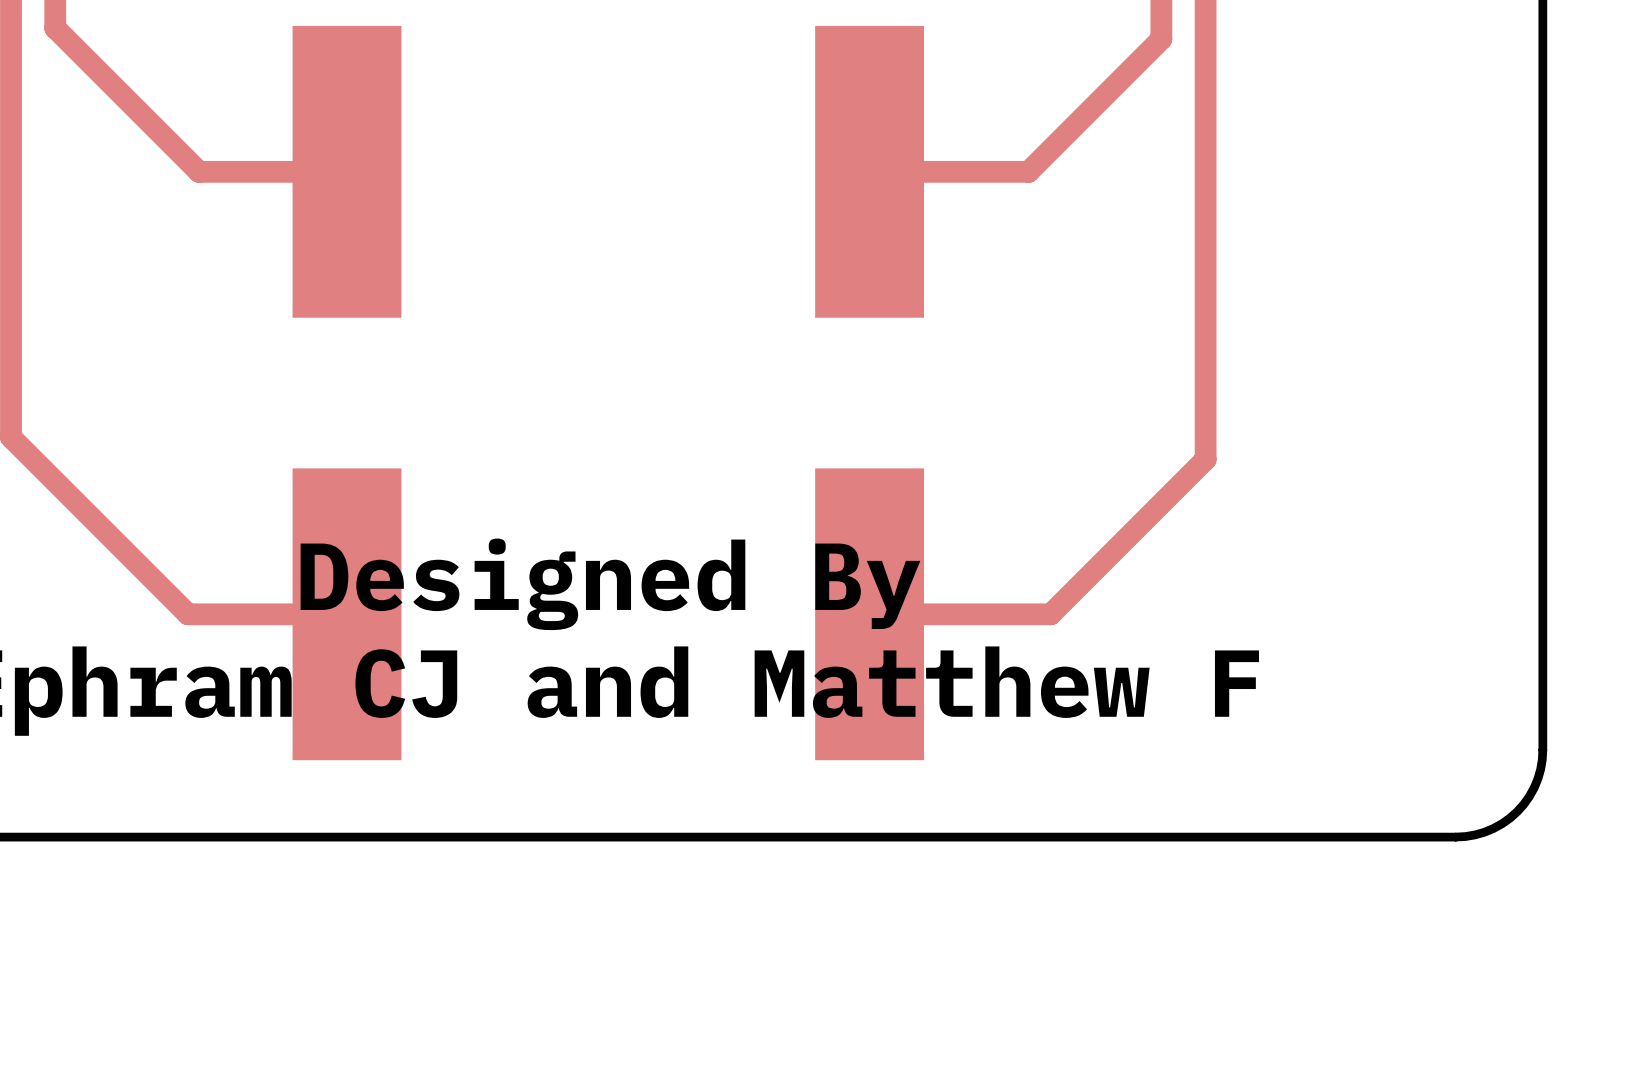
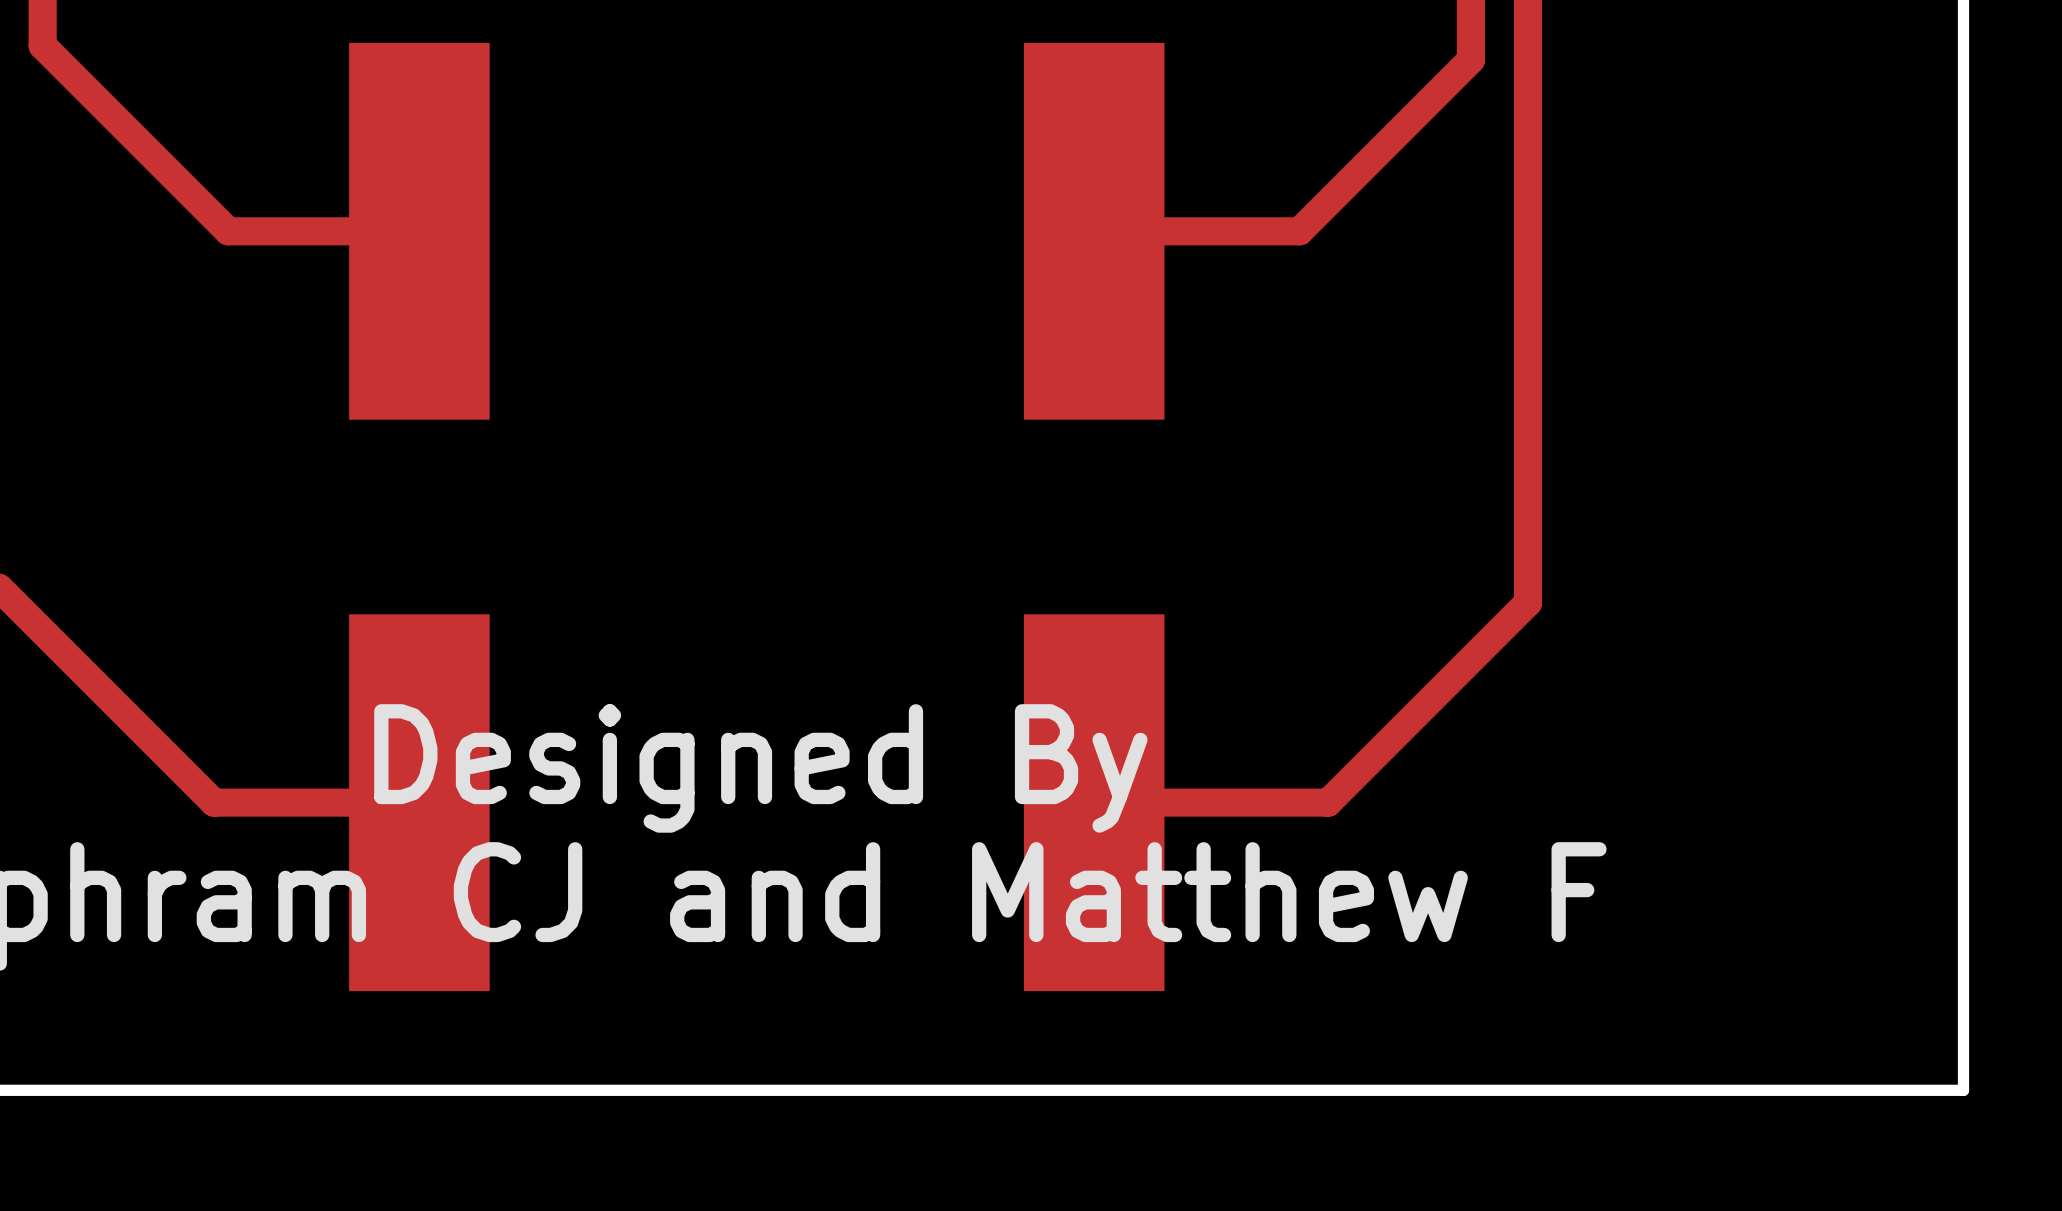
board edge: (1542, 750) (1537, 778) (1529, 796) (1517, 811) (1502, 823) (1484, 832) (1455, 837) -> (1963, 977) (1963, 1090) (1851, 1090)

